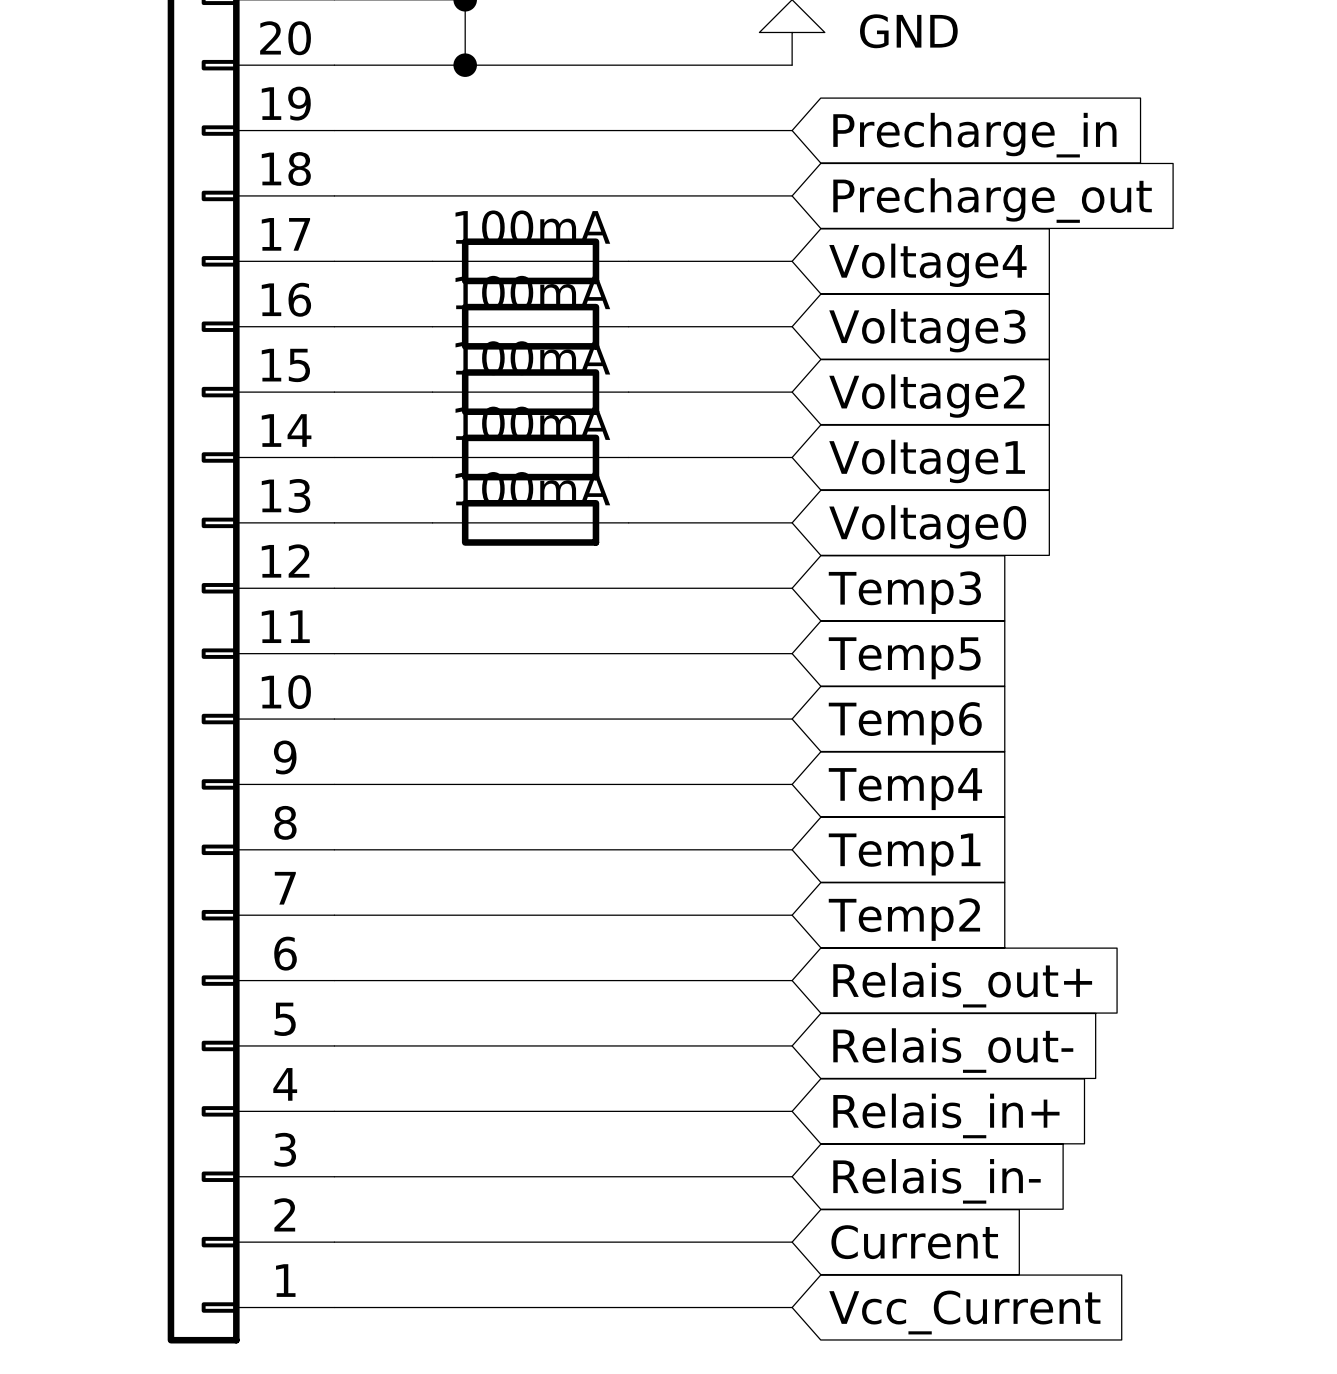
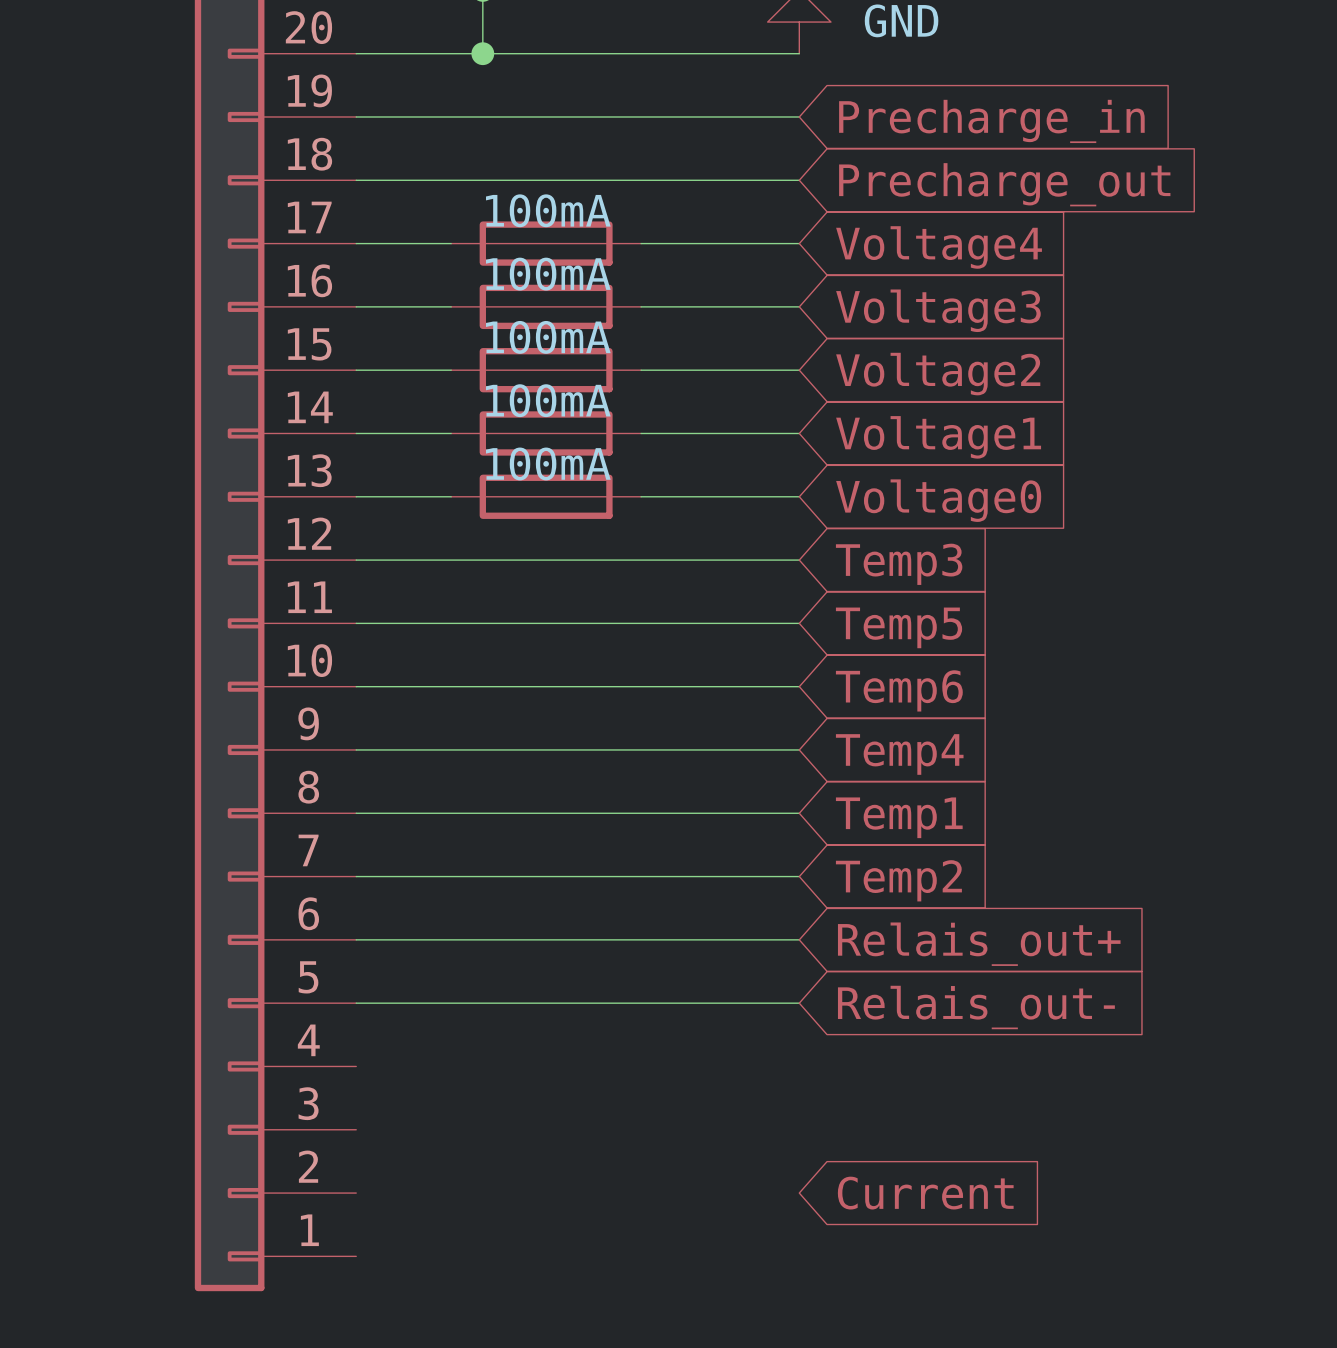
wire: (334, 1111) (792, 1111) -> none
global label: Relais_in+ (946, 1115) -> none
wire: (334, 1176) (792, 1176) -> none
global label: Relais_in- (937, 1181) -> none
wire: (334, 1242) (792, 1242) -> none
wire: (334, 1307) (792, 1307) -> none
global label: Vcc_Current (964, 1312) -> none

